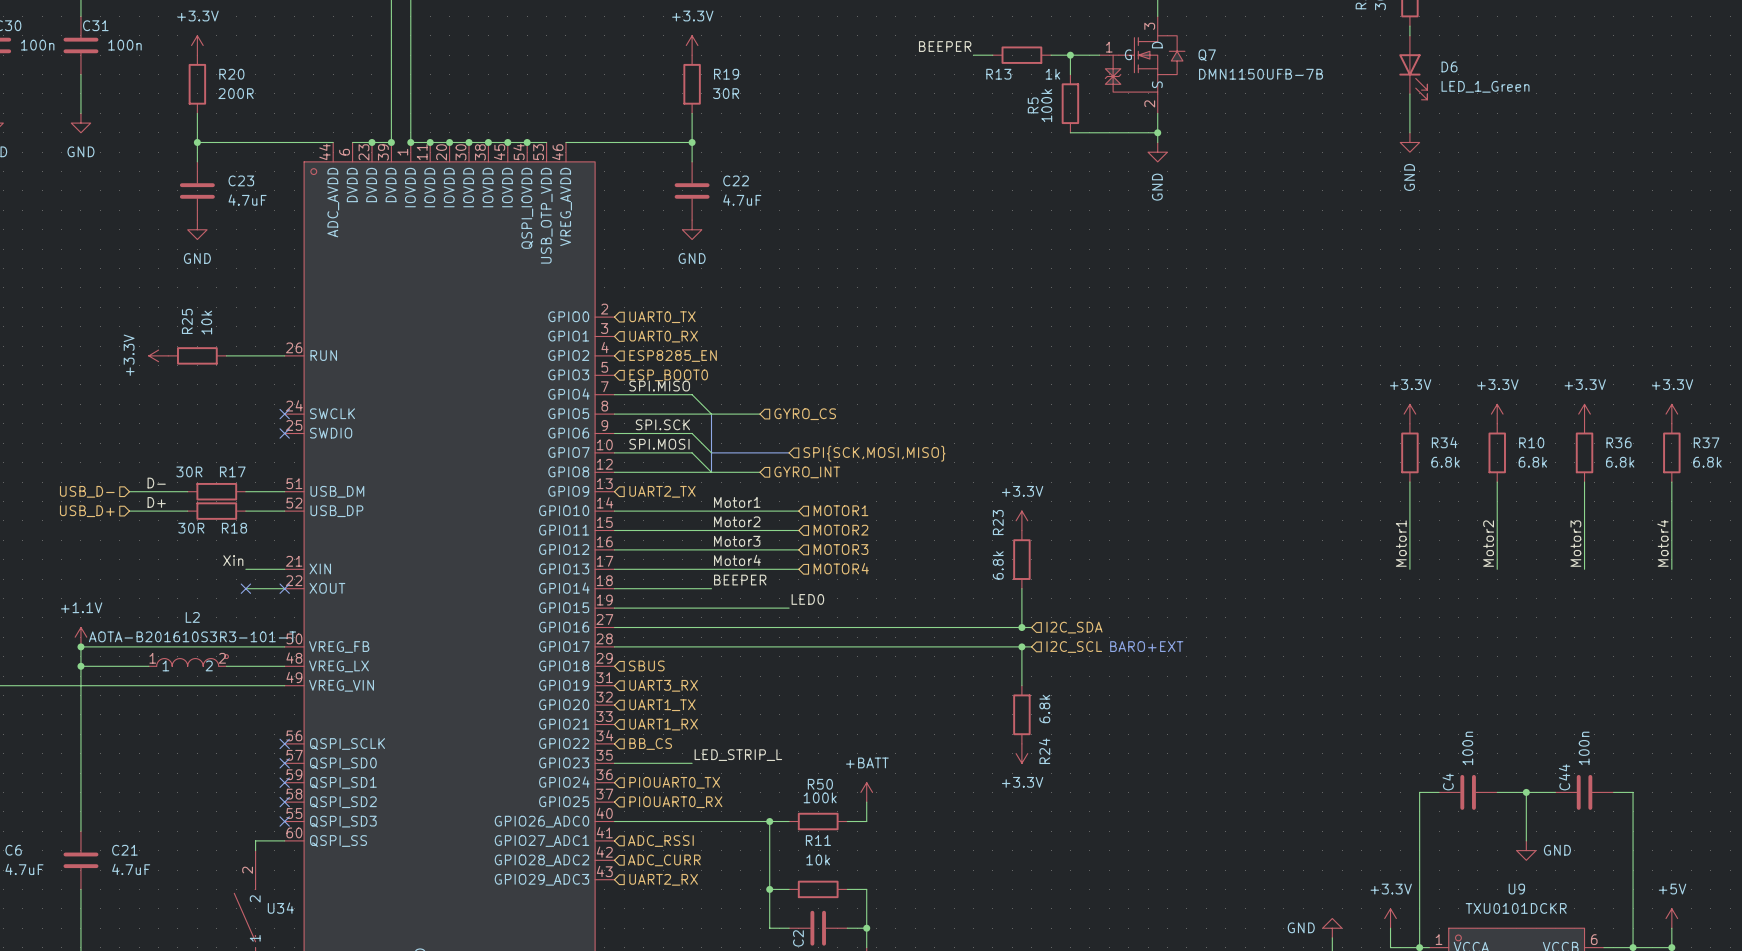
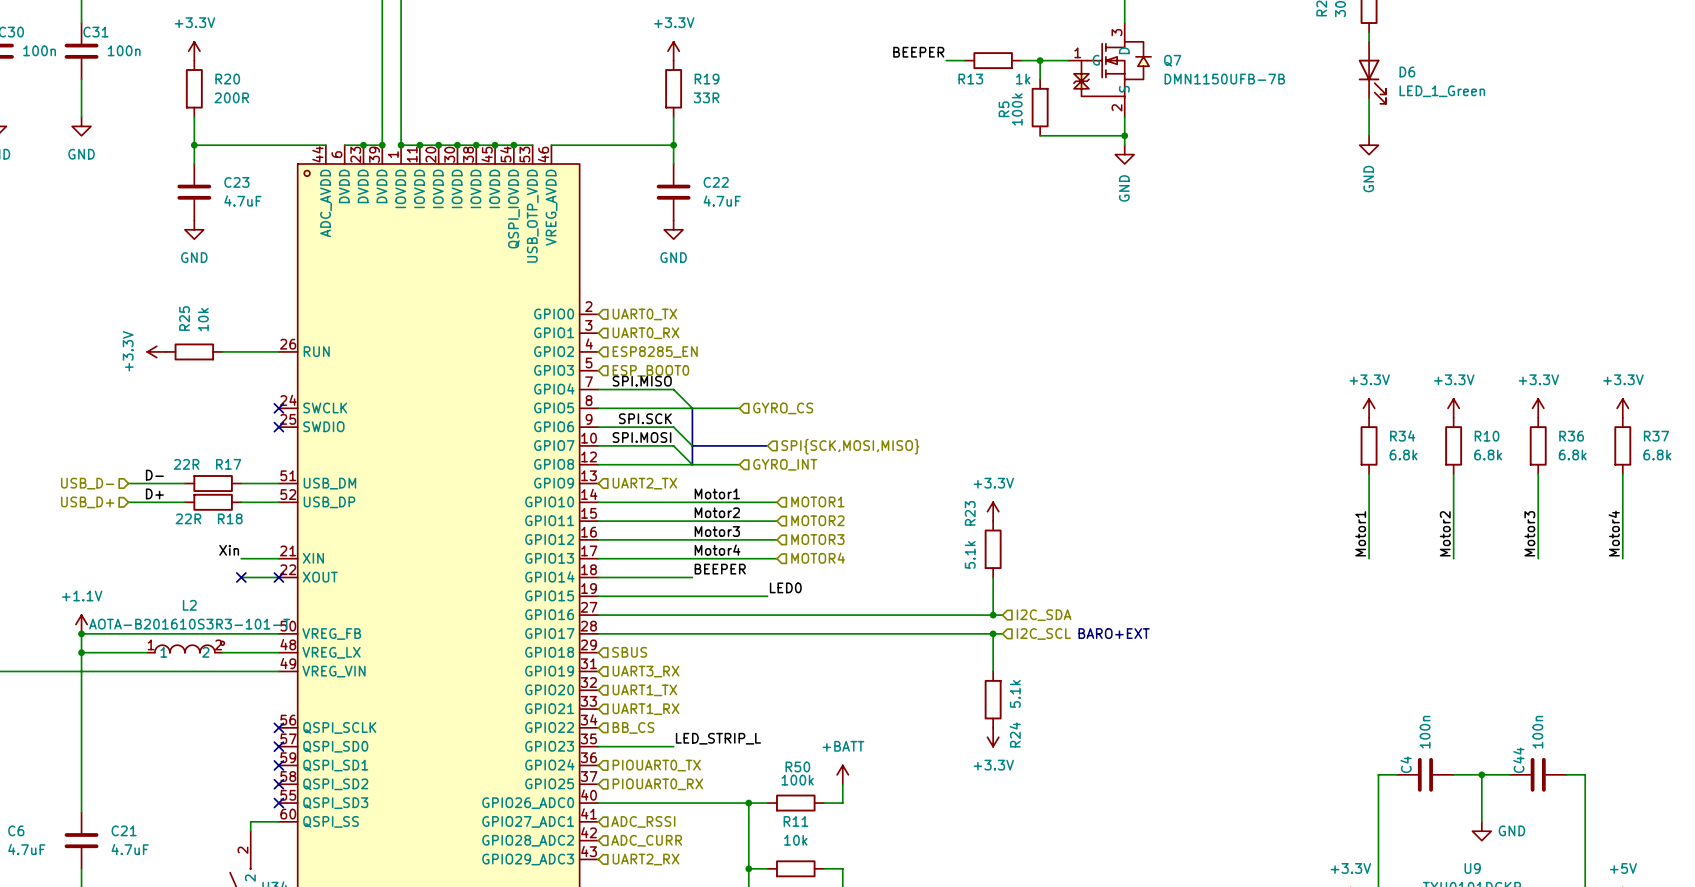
R19 value: 30R (726, 93) -> 33R (706, 97)
R17 value: 30R (189, 471) -> 22R (186, 464)
R18 value: 30R (191, 528) -> 22R (188, 518)
R23 value: 6.8k (998, 565) -> 5.1k (970, 554)
R24 value: 6.8k (1044, 708) -> 5.1k (1015, 694)

